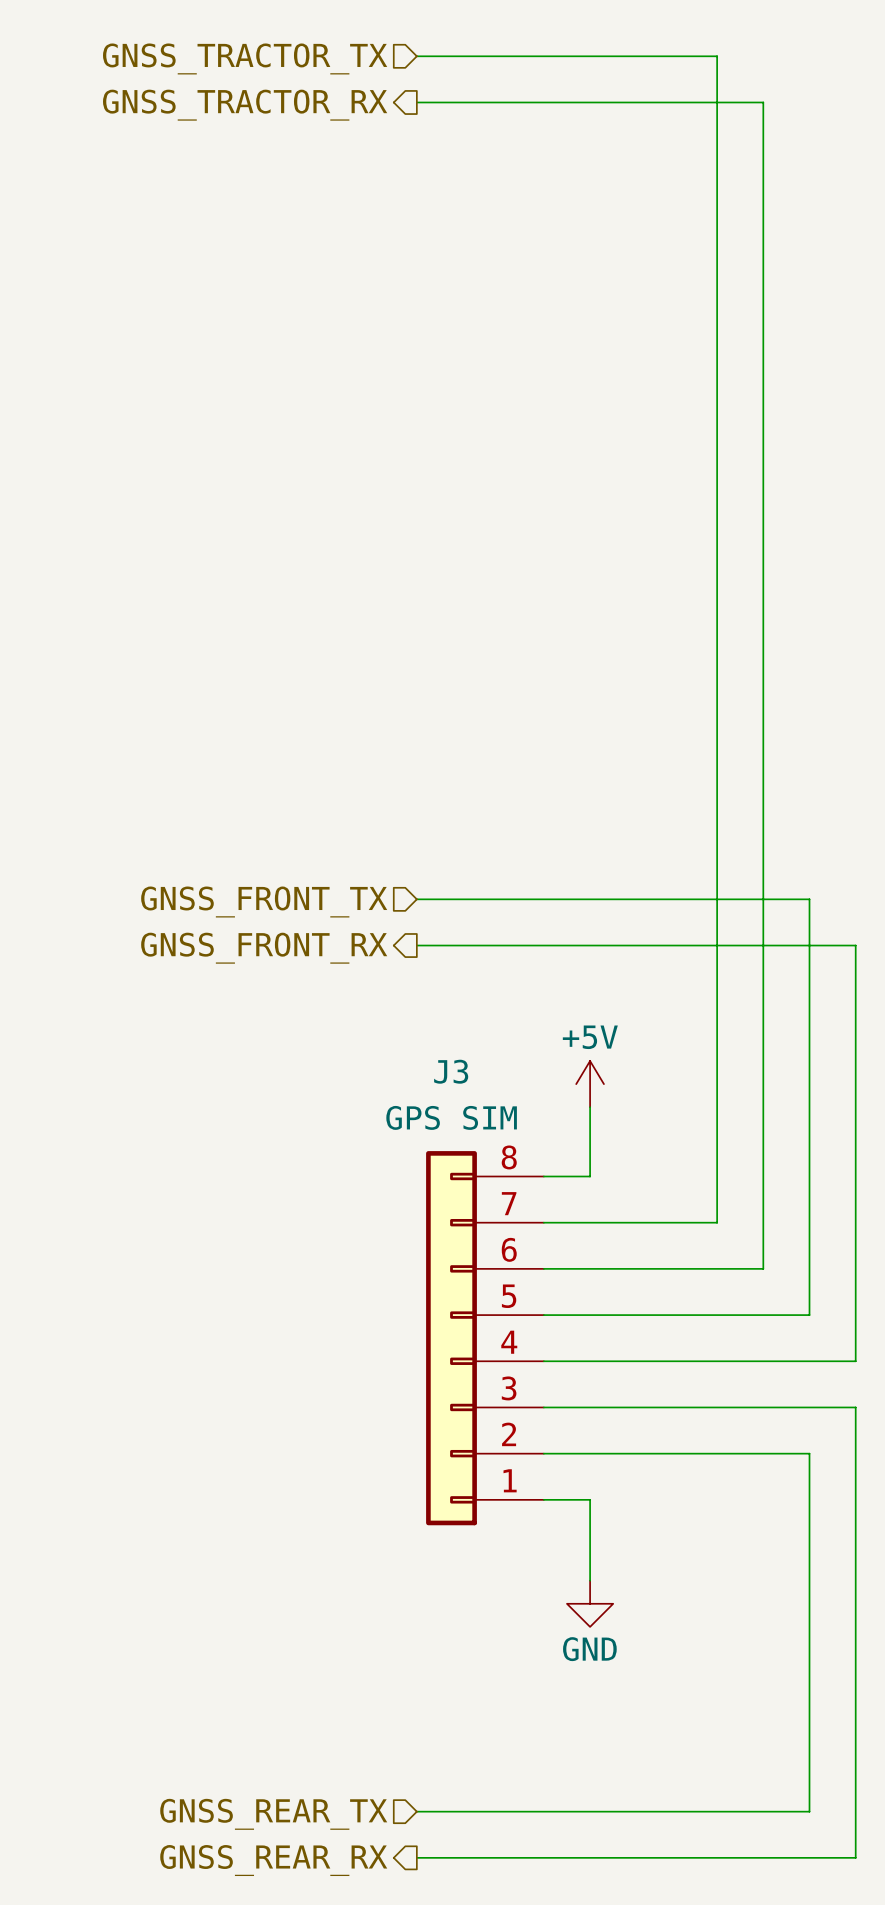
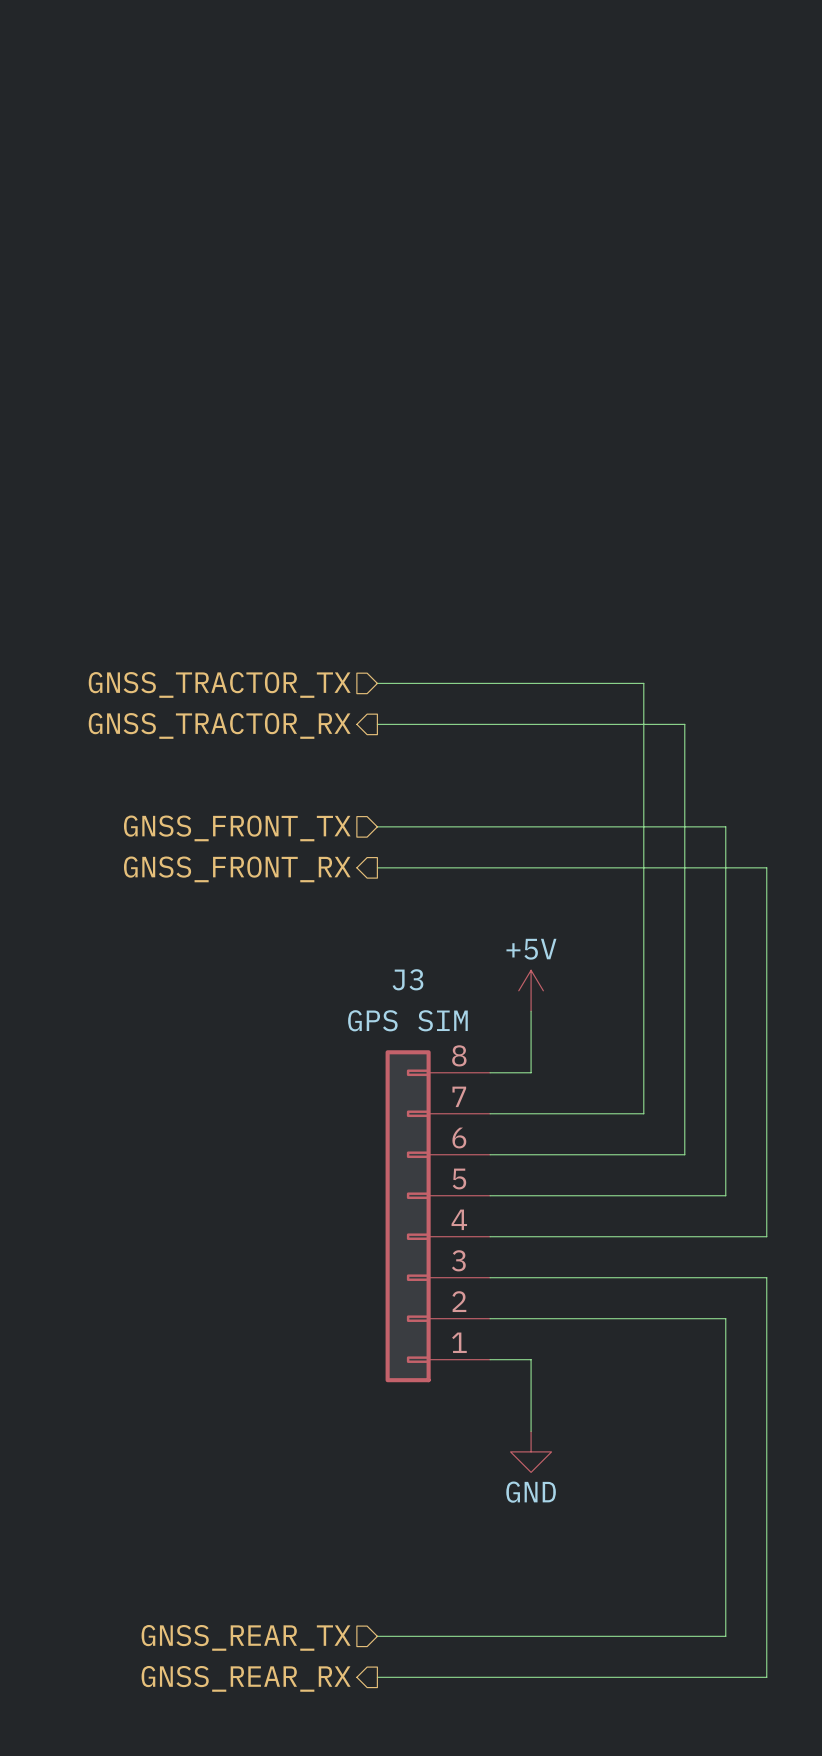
wire: (416, 56) (717, 56) (717, 737) -> (377, 683) (643, 683)
hierarchical label: GNSS_TRACTOR_TX (245, 58) -> none
wire: (416, 102) (763, 102) (763, 783) -> (377, 724) (684, 724)
hierarchical label: GNSS_TRACTOR_RX (245, 105) -> none
hierarchical label: none -> GNSS_TRACTOR_TX (219, 684)
hierarchical label: none -> GNSS_TRACTOR_RX (219, 725)

